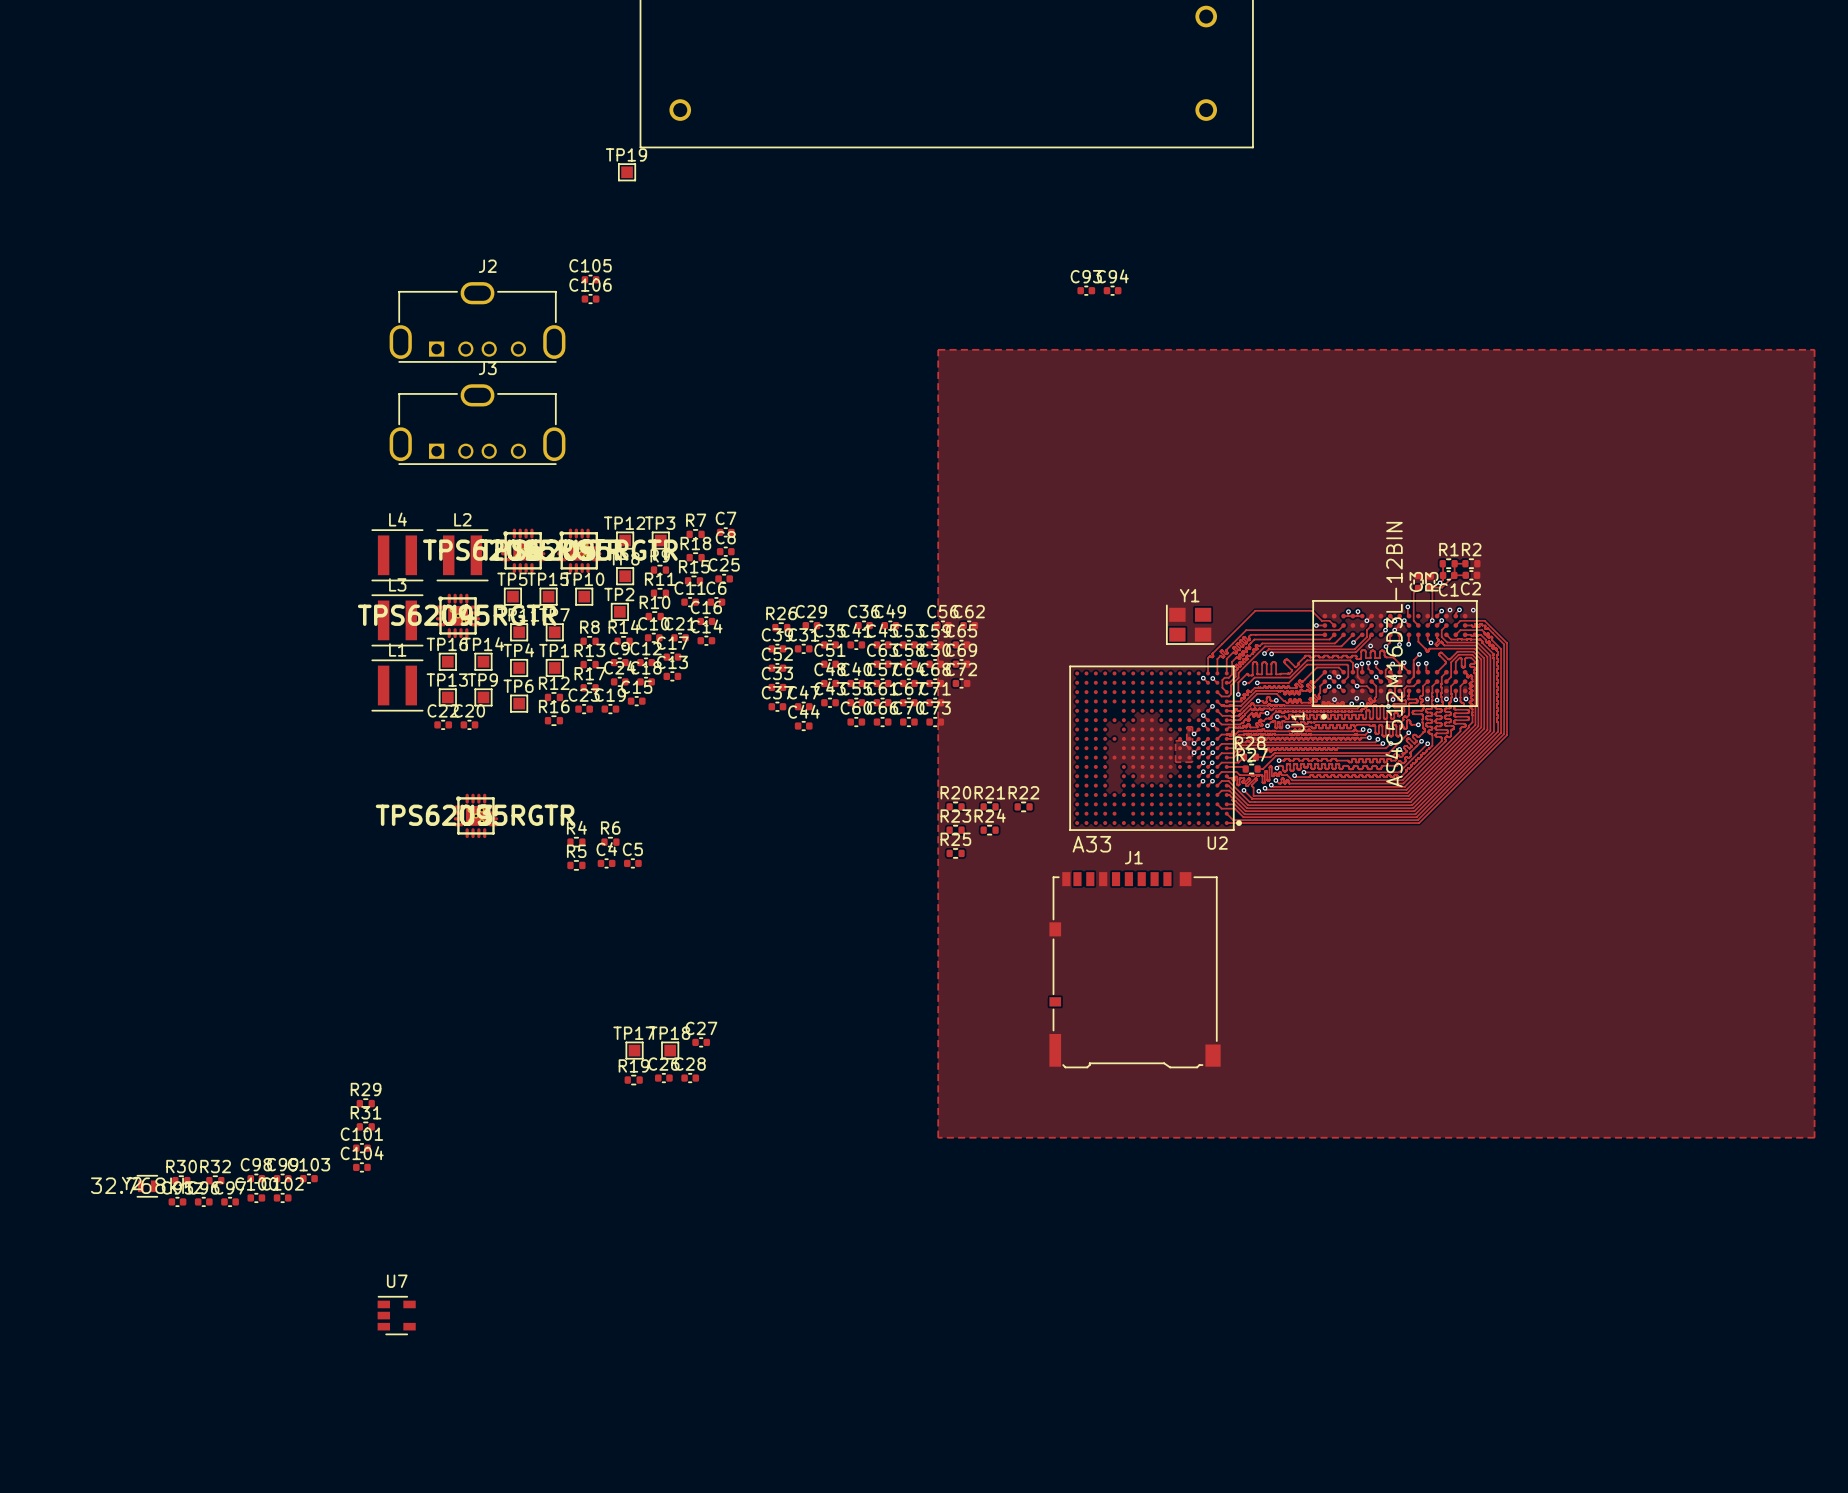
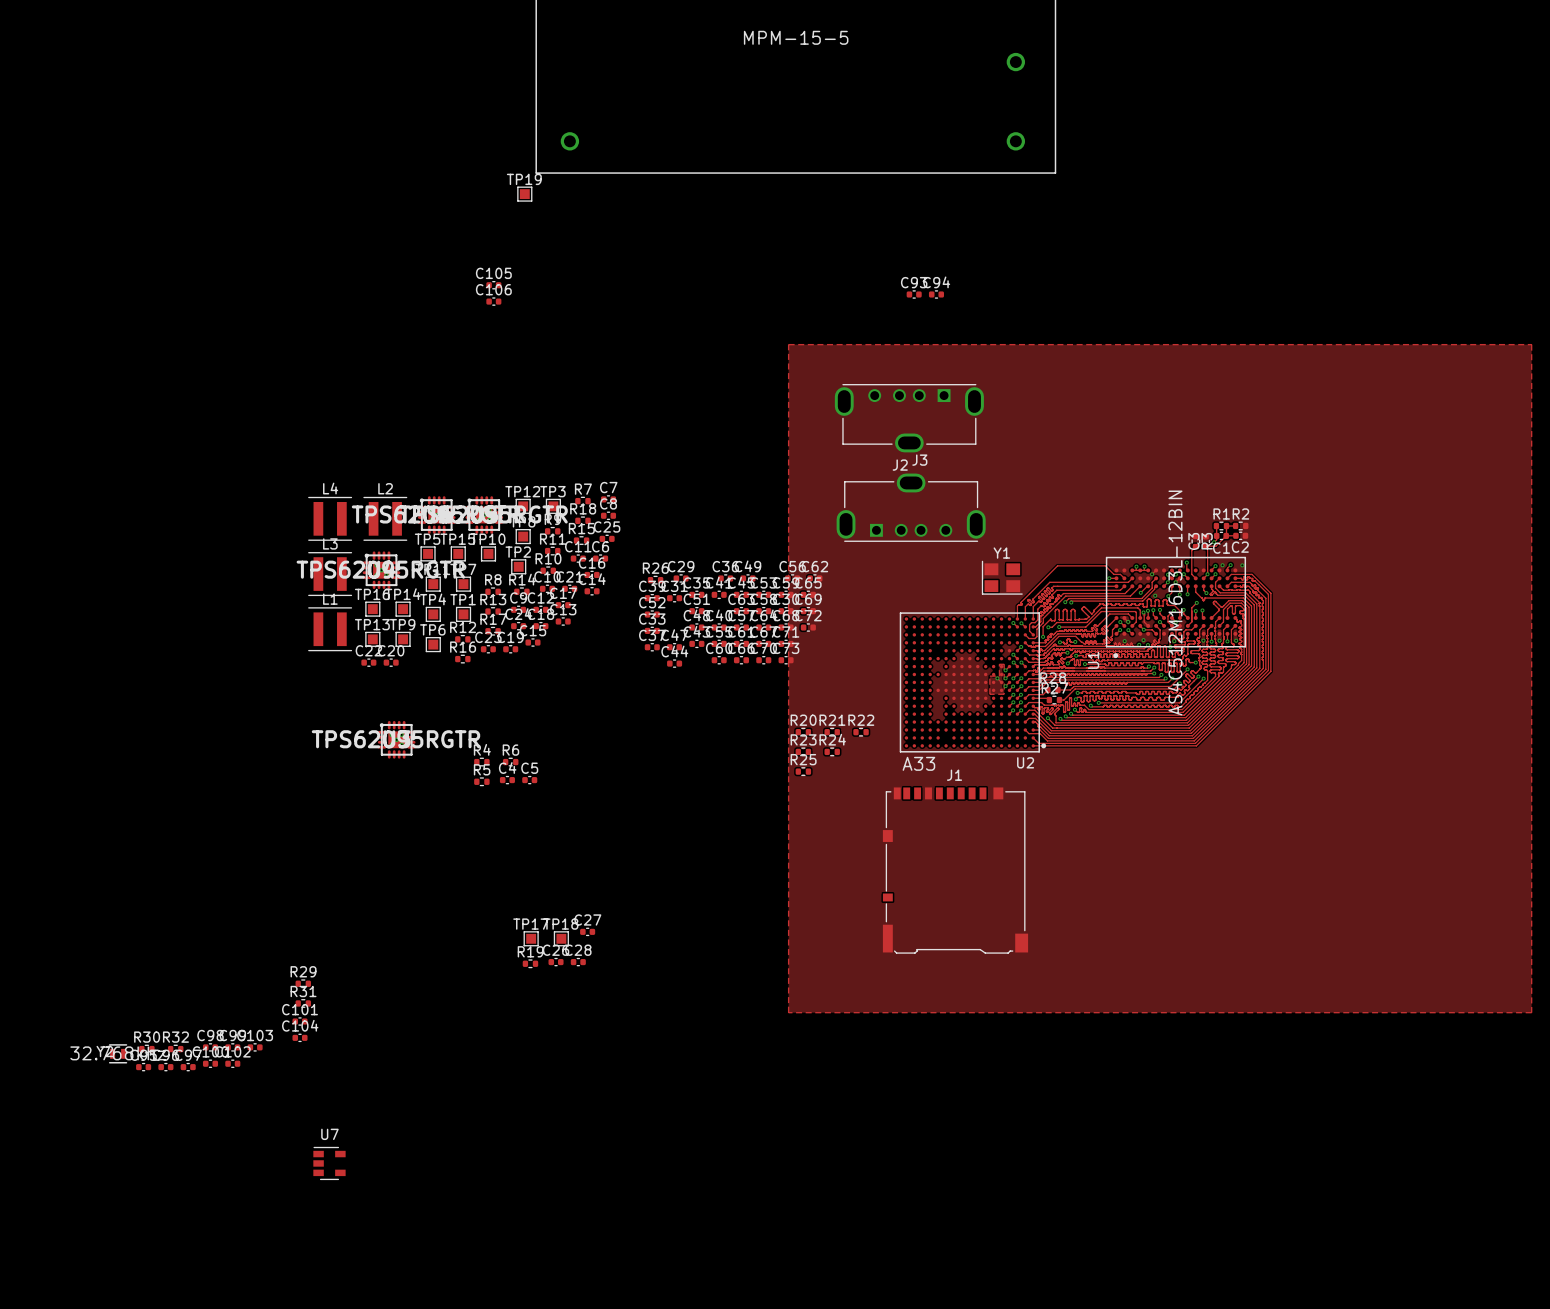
J2 rotation: 0° (477, 322) -> 180° (909, 418)
J2 position: (477, 322) -> (909, 418)
J3 position: (477, 424) -> (911, 507)

